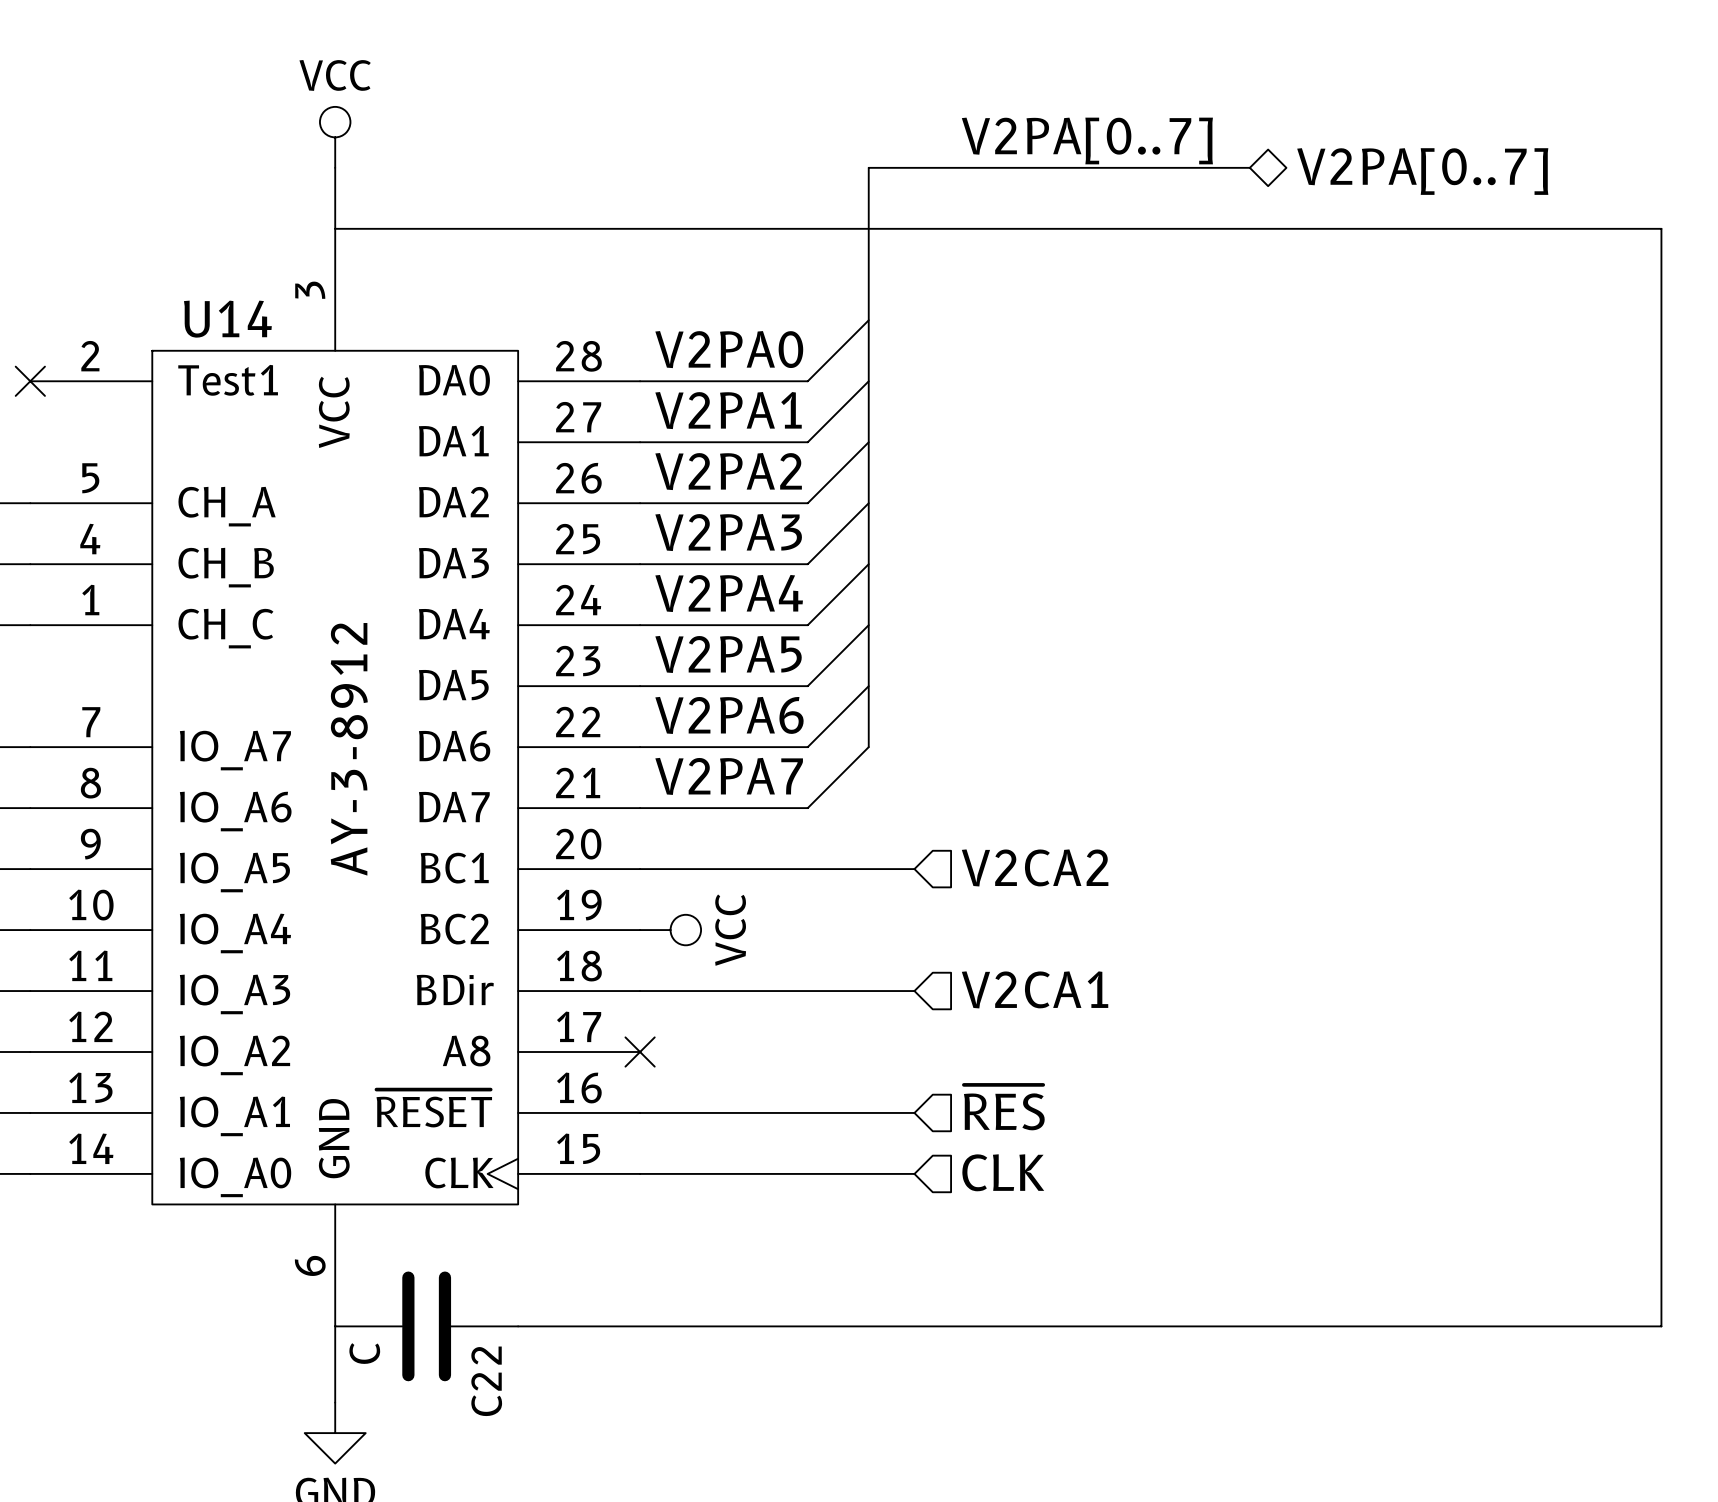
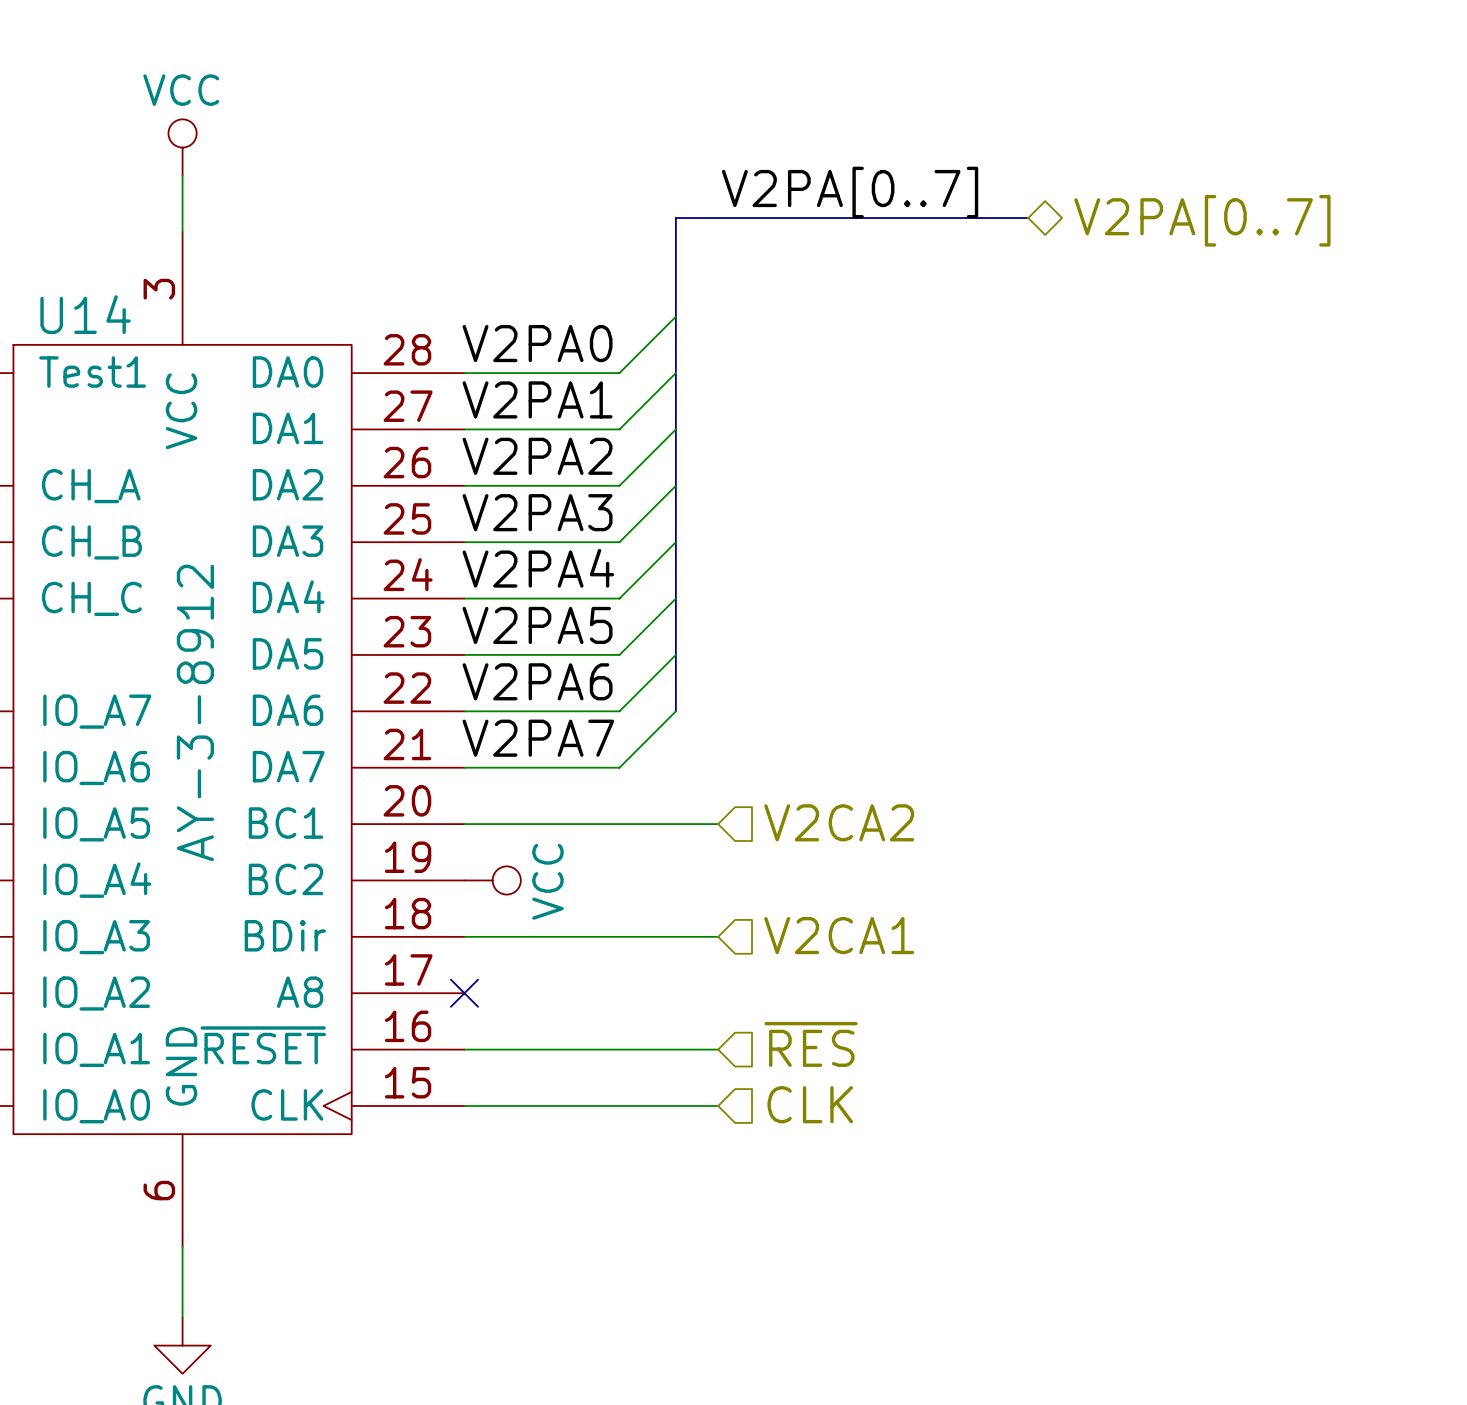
label position: V2PA[0..7] (1087, 140) -> V2PA[0..7] (850, 192)
bus: (1249, 167) (868, 167) (868, 213) -> (1028, 218) (675, 218)
hierarchical label position: V2PA[0..7] (1422, 171) -> V2PA[0..7] (1202, 220)
wire: (335, 228) (1661, 228) (1661, 1326) (518, 1326) -> none
C22: C (426, 1326) -> none

